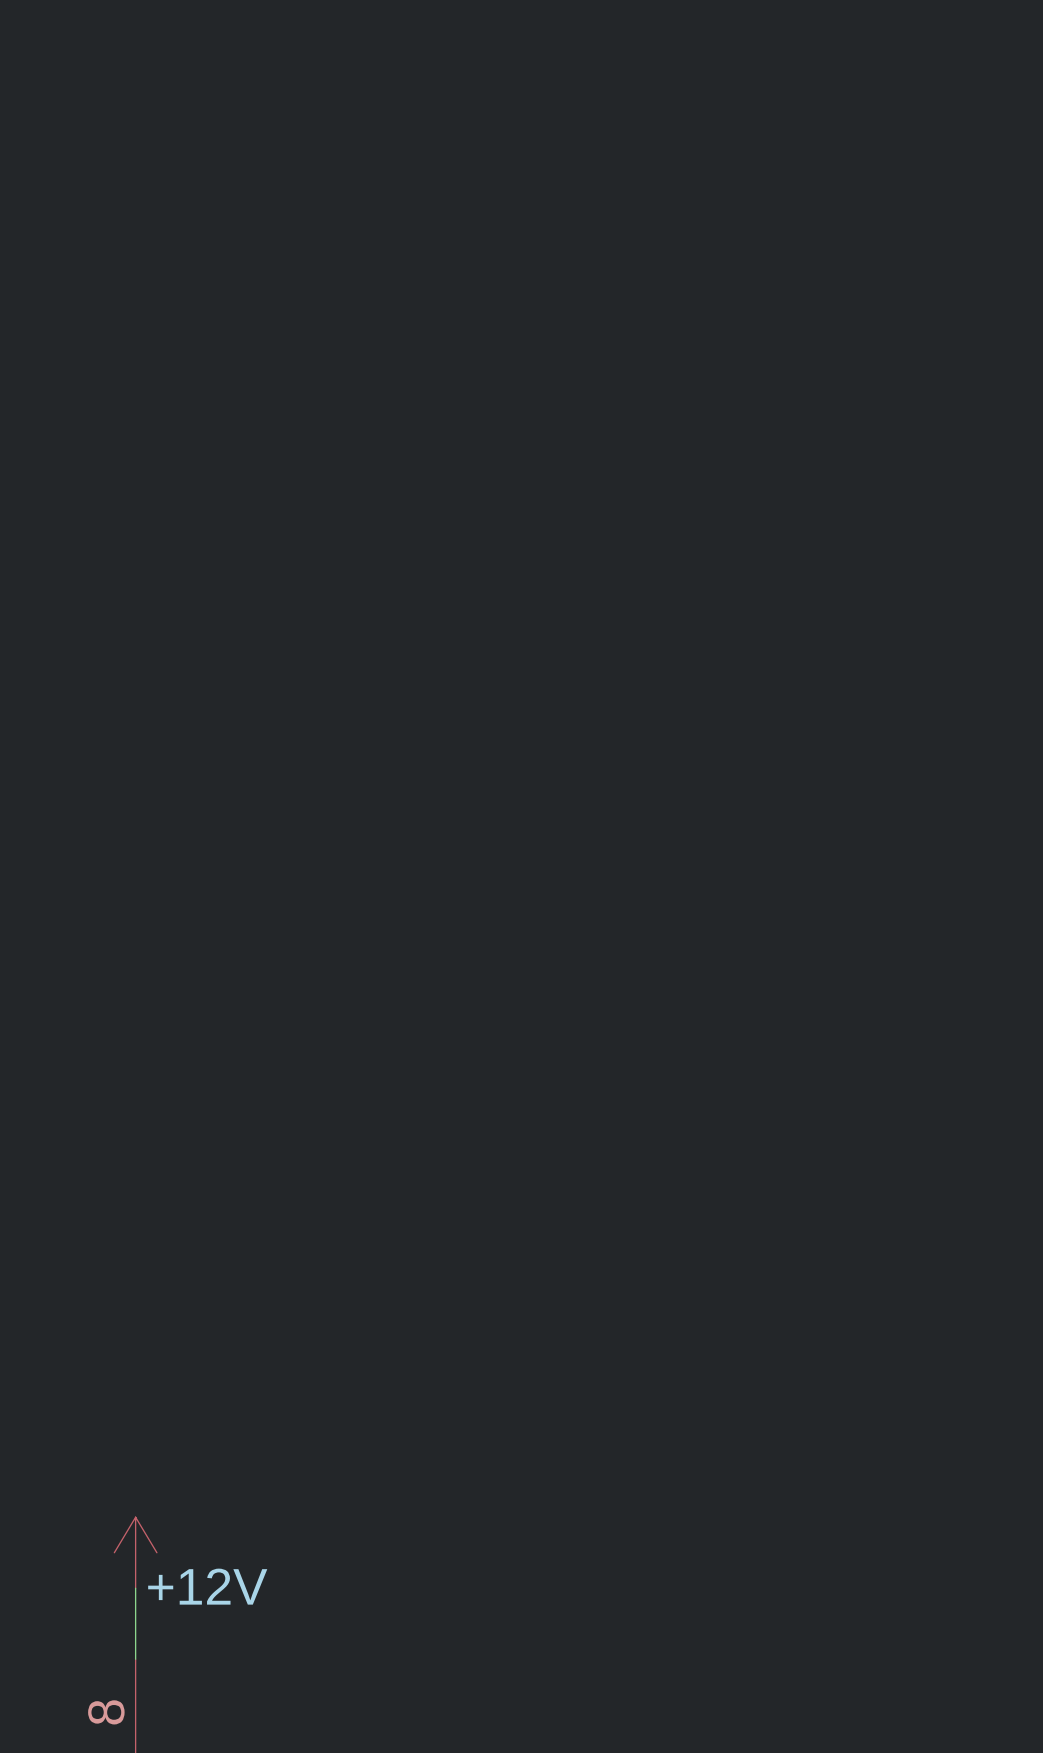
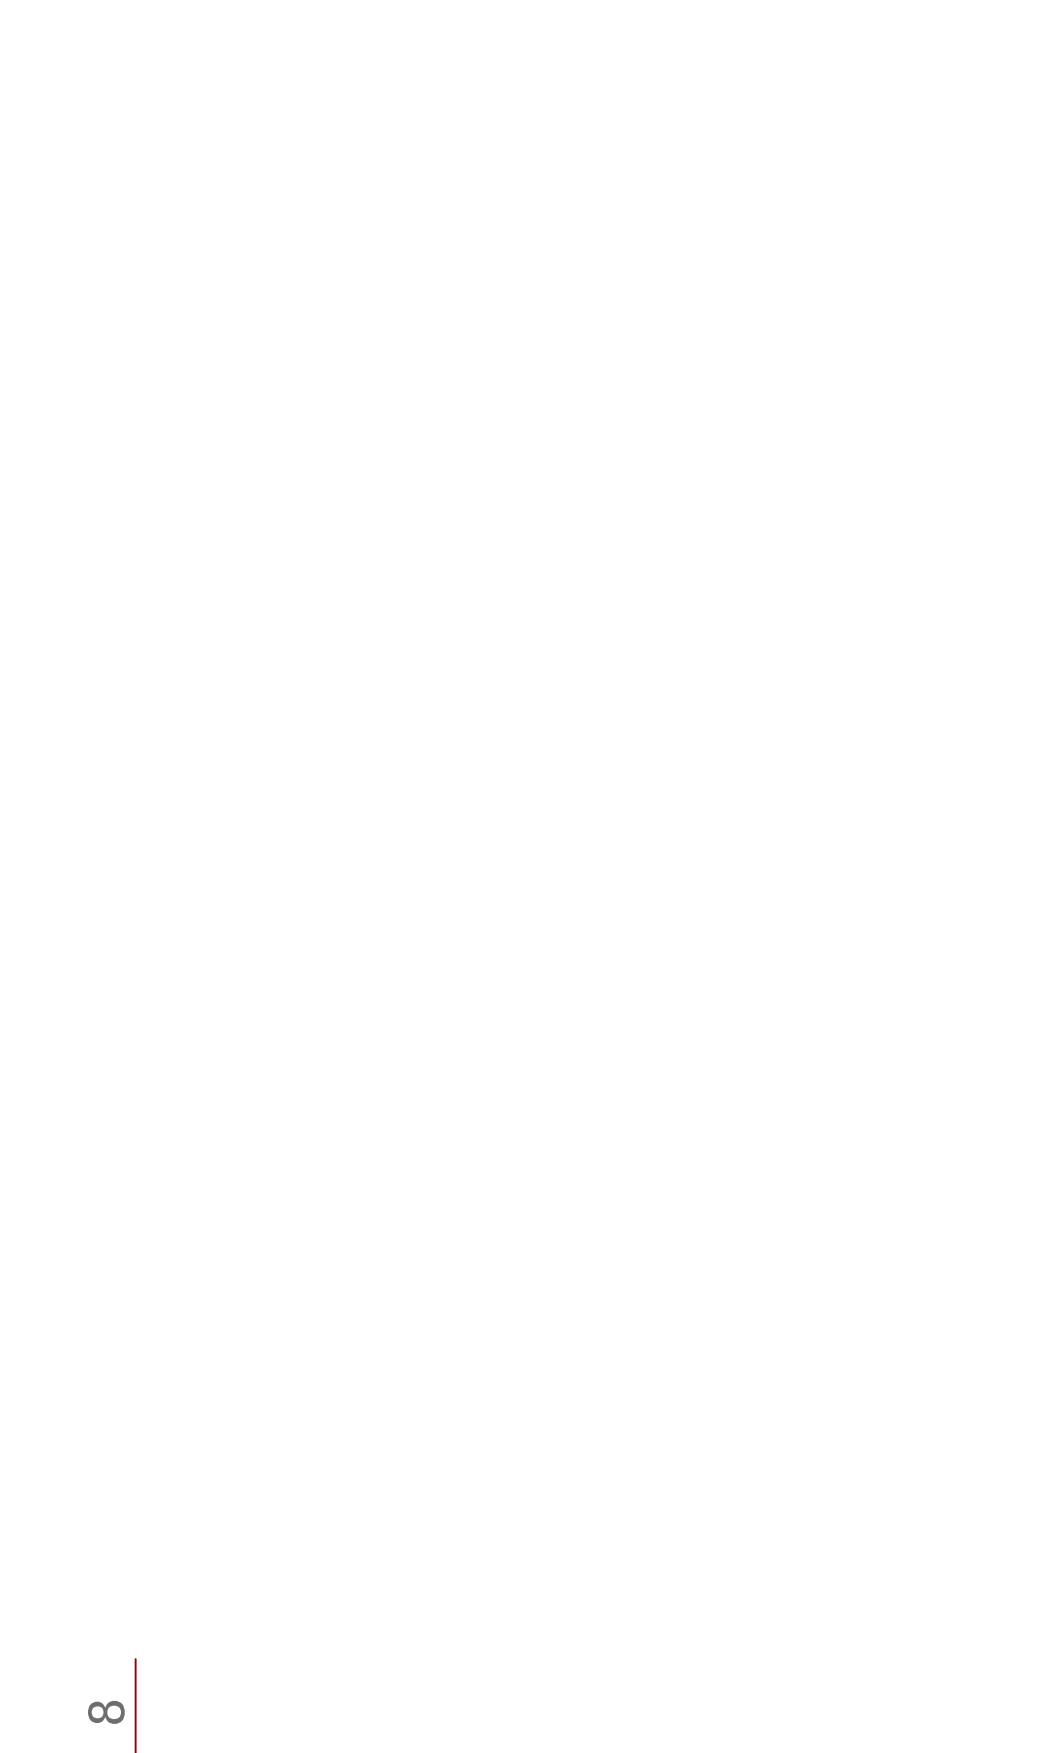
power symbol: +12V (135, 1552) -> none
wire: (135, 1588) (135, 1659) -> none

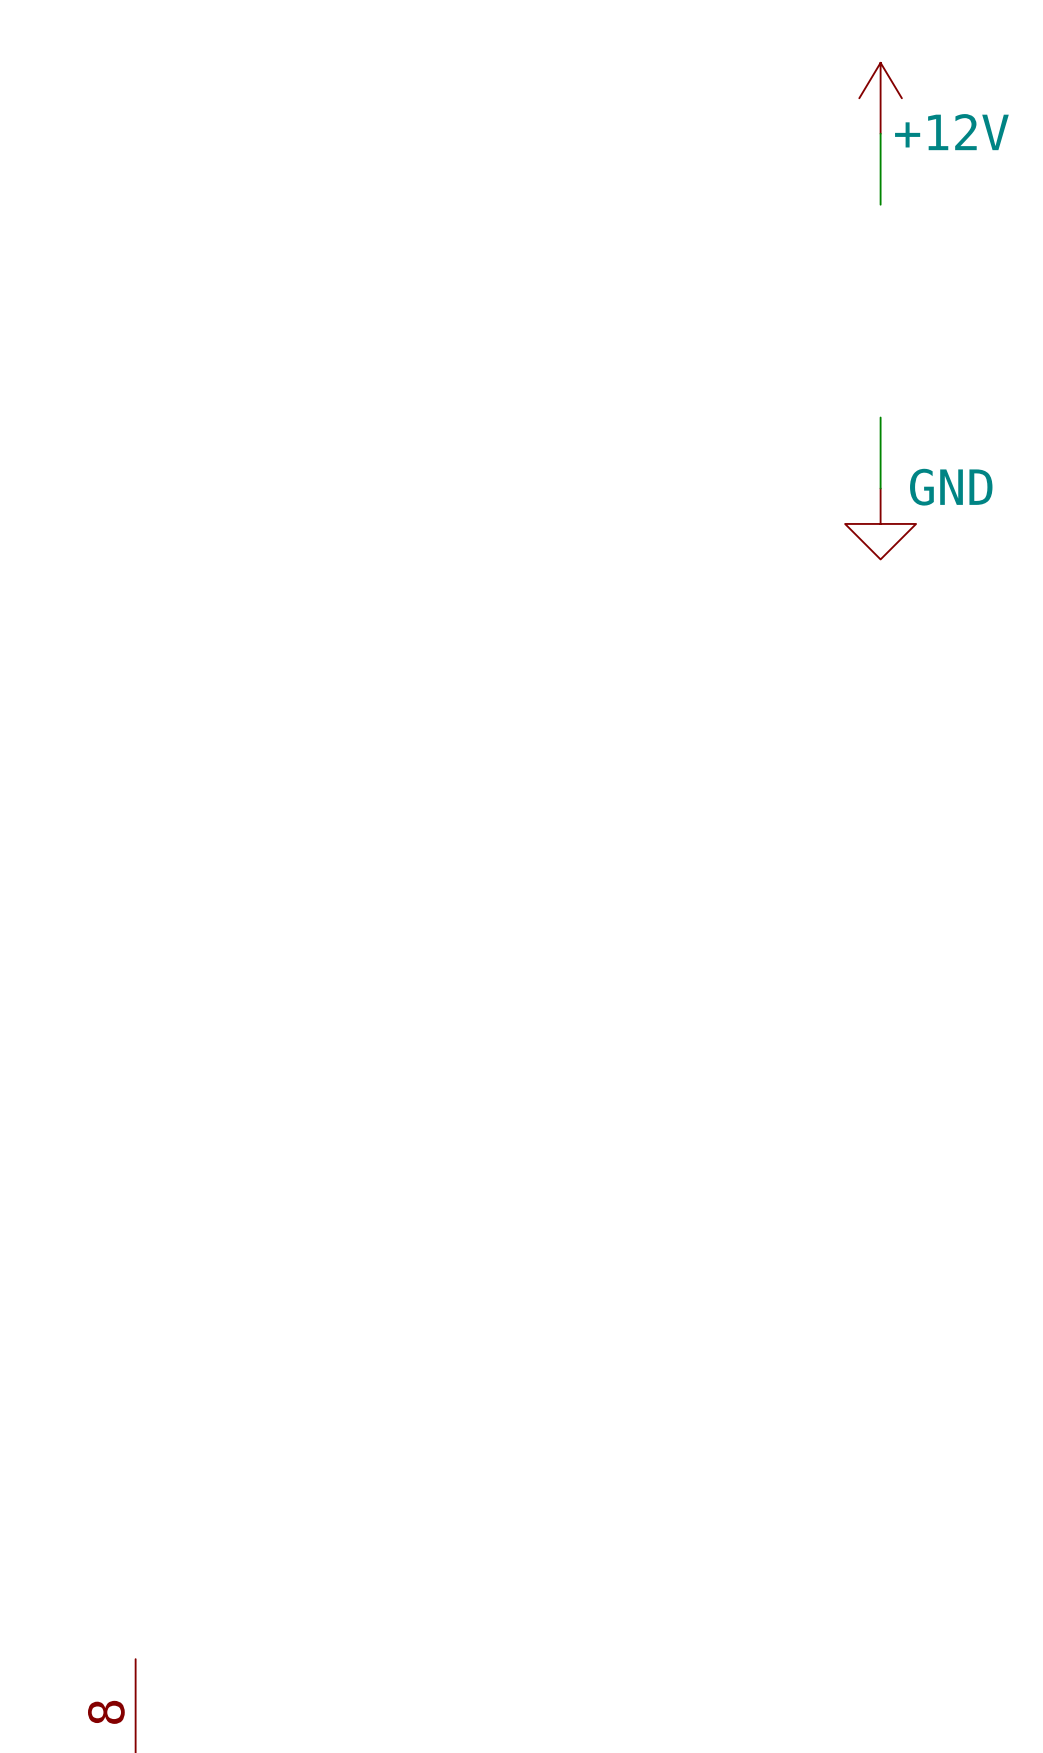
power symbol: none -> +12V (880, 98)
wire: none -> (880, 133) (880, 204)
wire: none -> (880, 417) (880, 488)
power symbol: none -> GND (880, 523)

